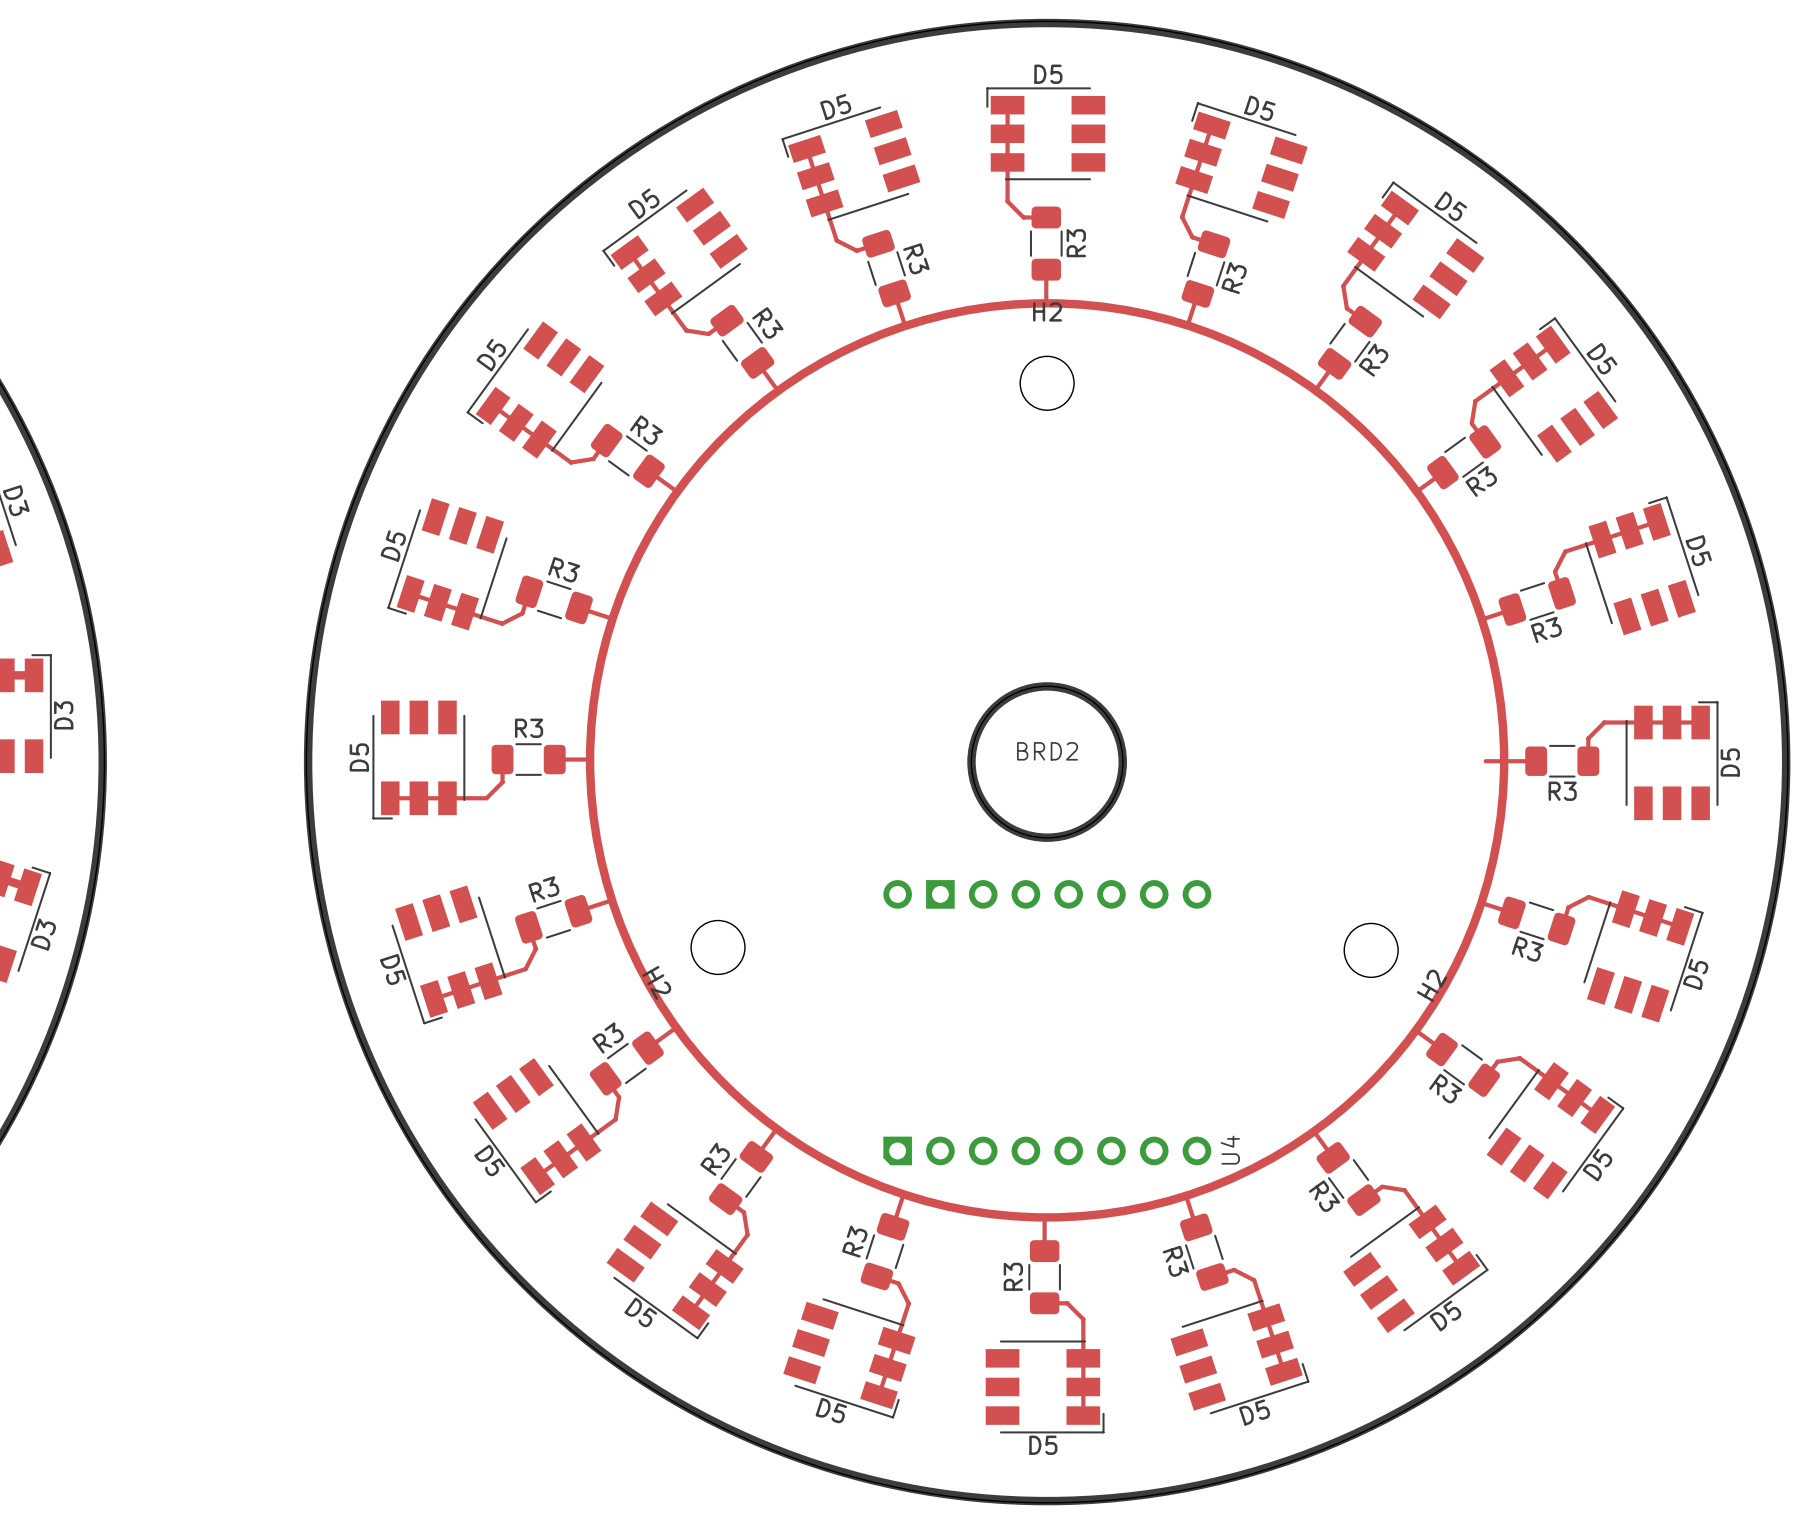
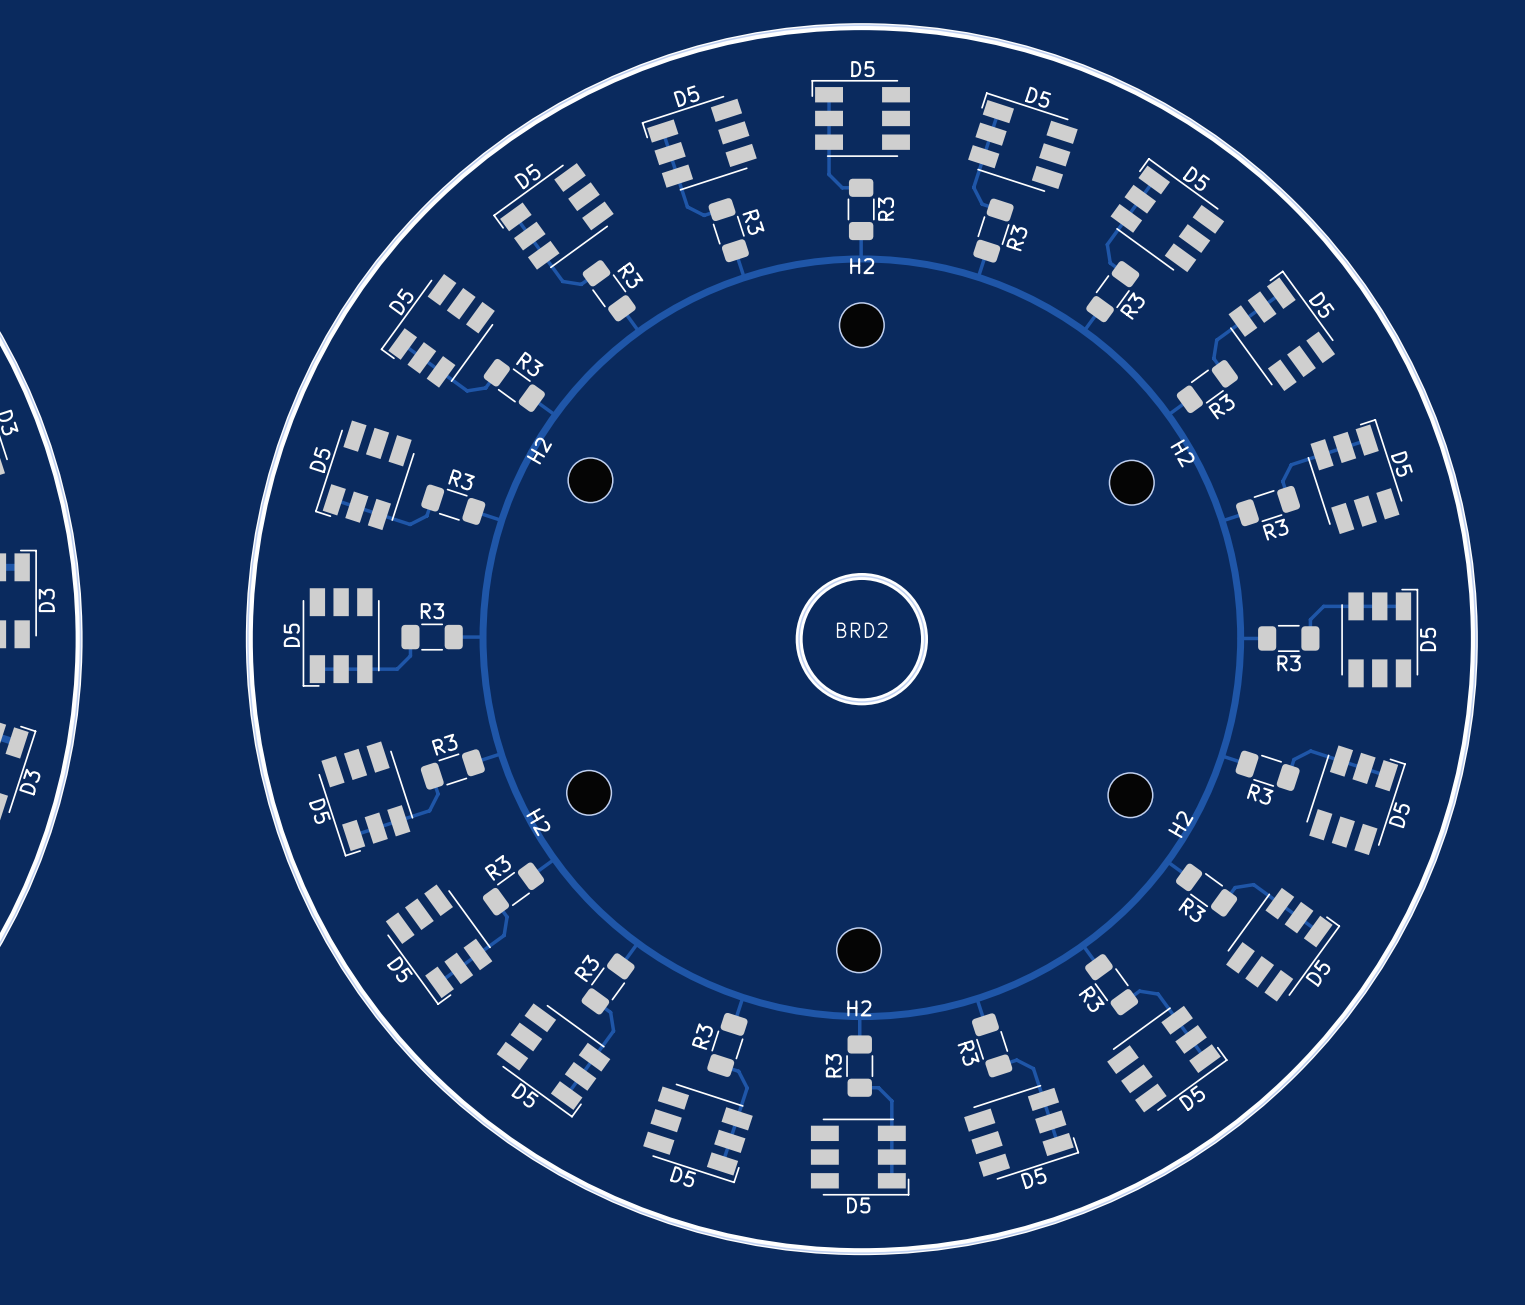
H2: none -> (590, 480)
H2: none -> (1131, 482)
track: (1485, 761) (1502, 761) -> none
U4: (1047, 1022) -> none
H2: none -> (859, 950)

